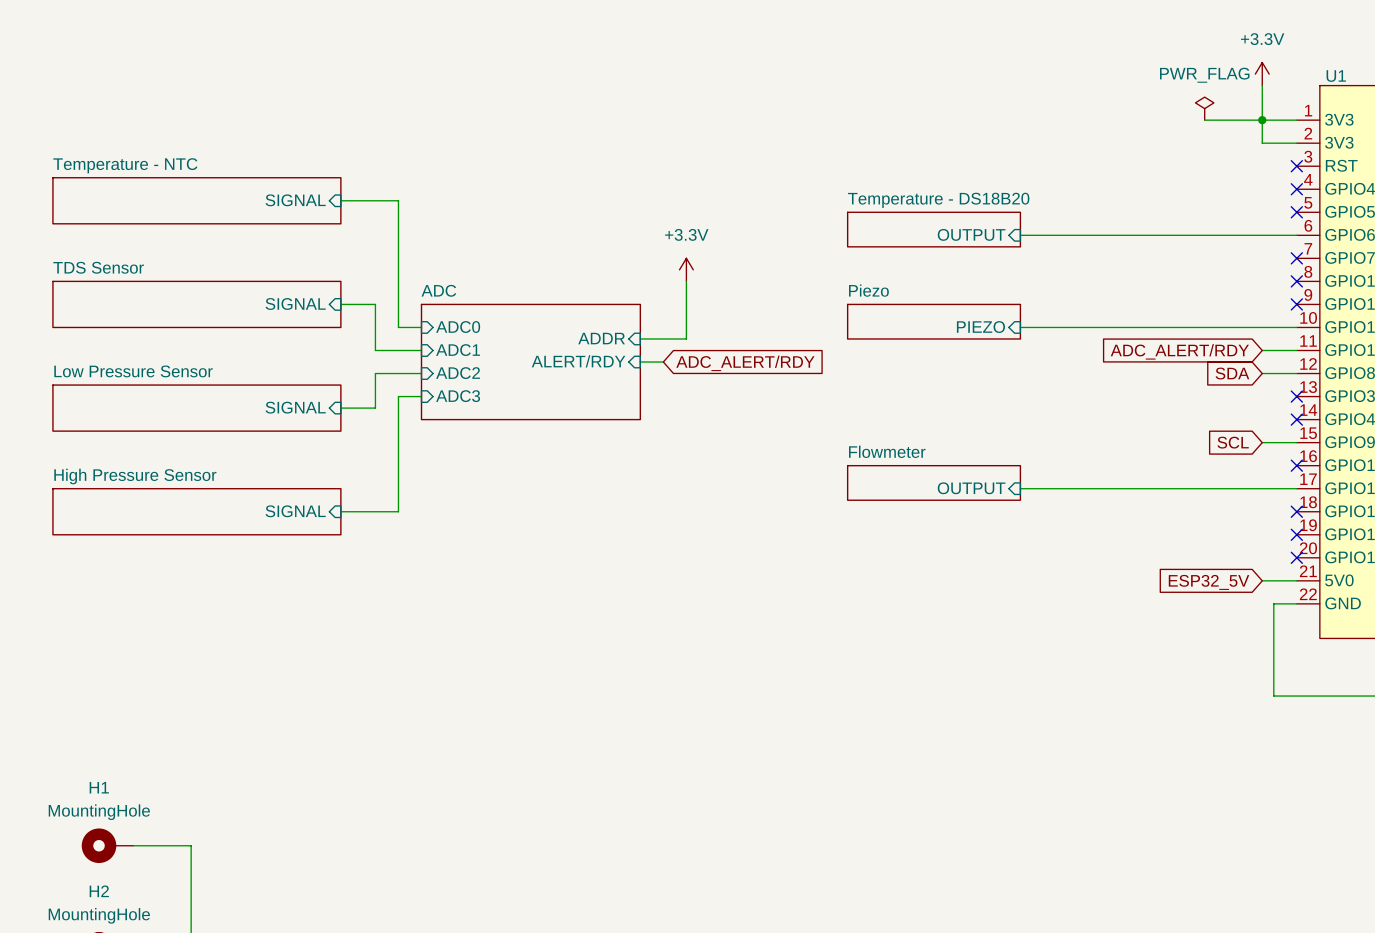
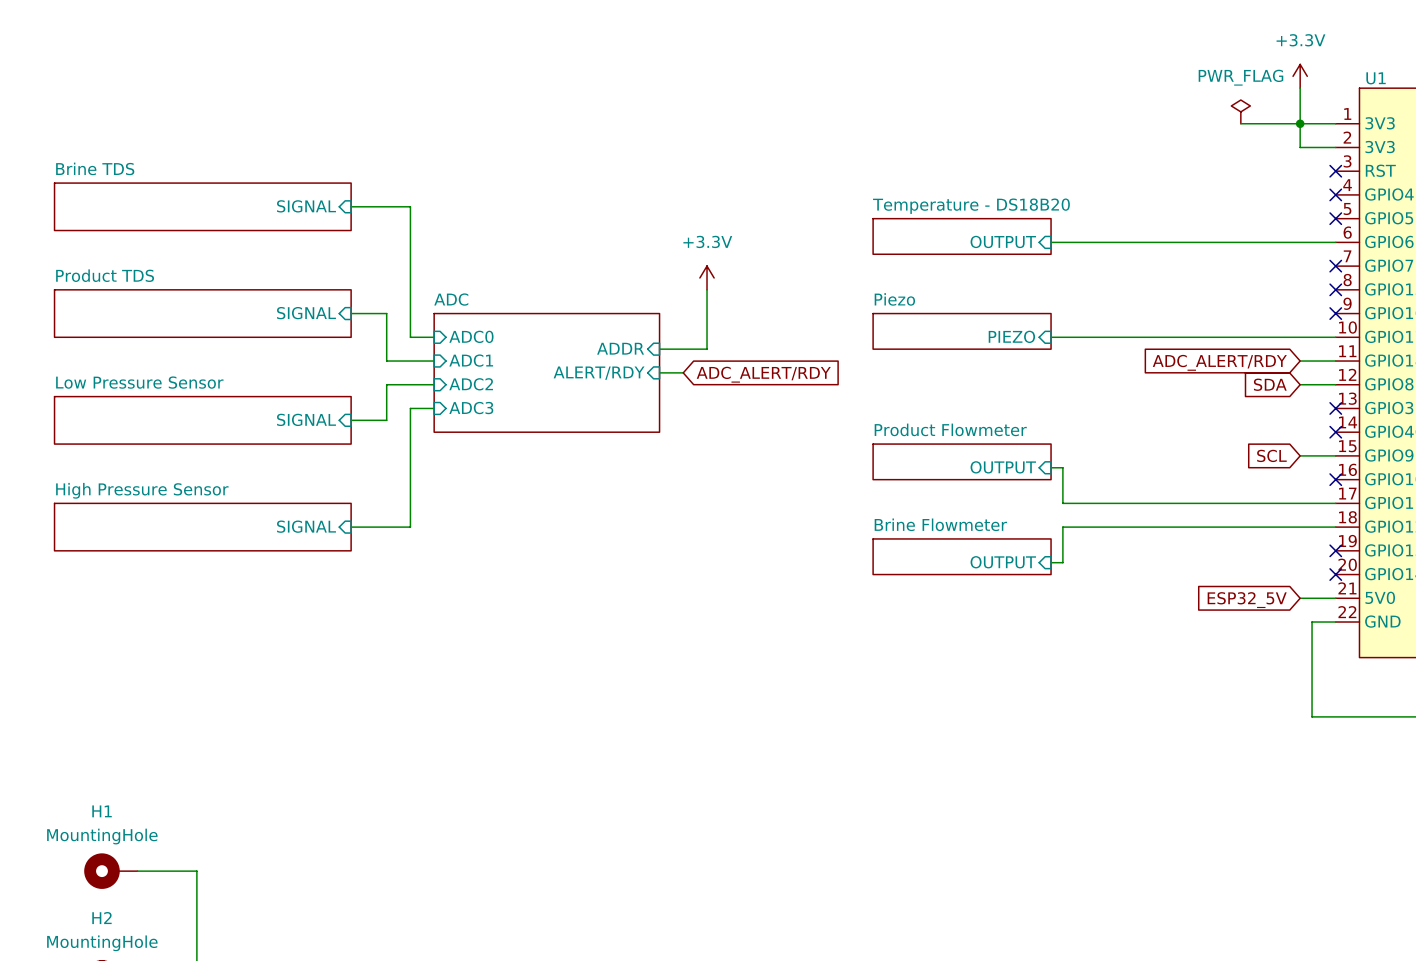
sheet Temperature - NTC name: Temperature - NTC (125, 165) -> Brine TDS (95, 168)
sheet TDS Sensor name: TDS Sensor (98, 267) -> Product TDS (105, 275)
sheet Product Flowmeter: none -> (962, 461)
sheet pin: none -> OUTPUT (1003, 467)
sheet Flowmeter: (934, 482) -> none
sheet pin: OUTPUT (971, 488) -> none
wire: (1020, 488) (1031, 488) -> (1051, 467) (1062, 467) (1062, 503)
wire: none -> (1335, 527) (1062, 527) (1062, 562) (1051, 562)
no-connect mark: (1296, 511) -> none
sheet Brine Flowmeter: none -> (962, 556)
sheet pin: none -> OUTPUT (1003, 562)

